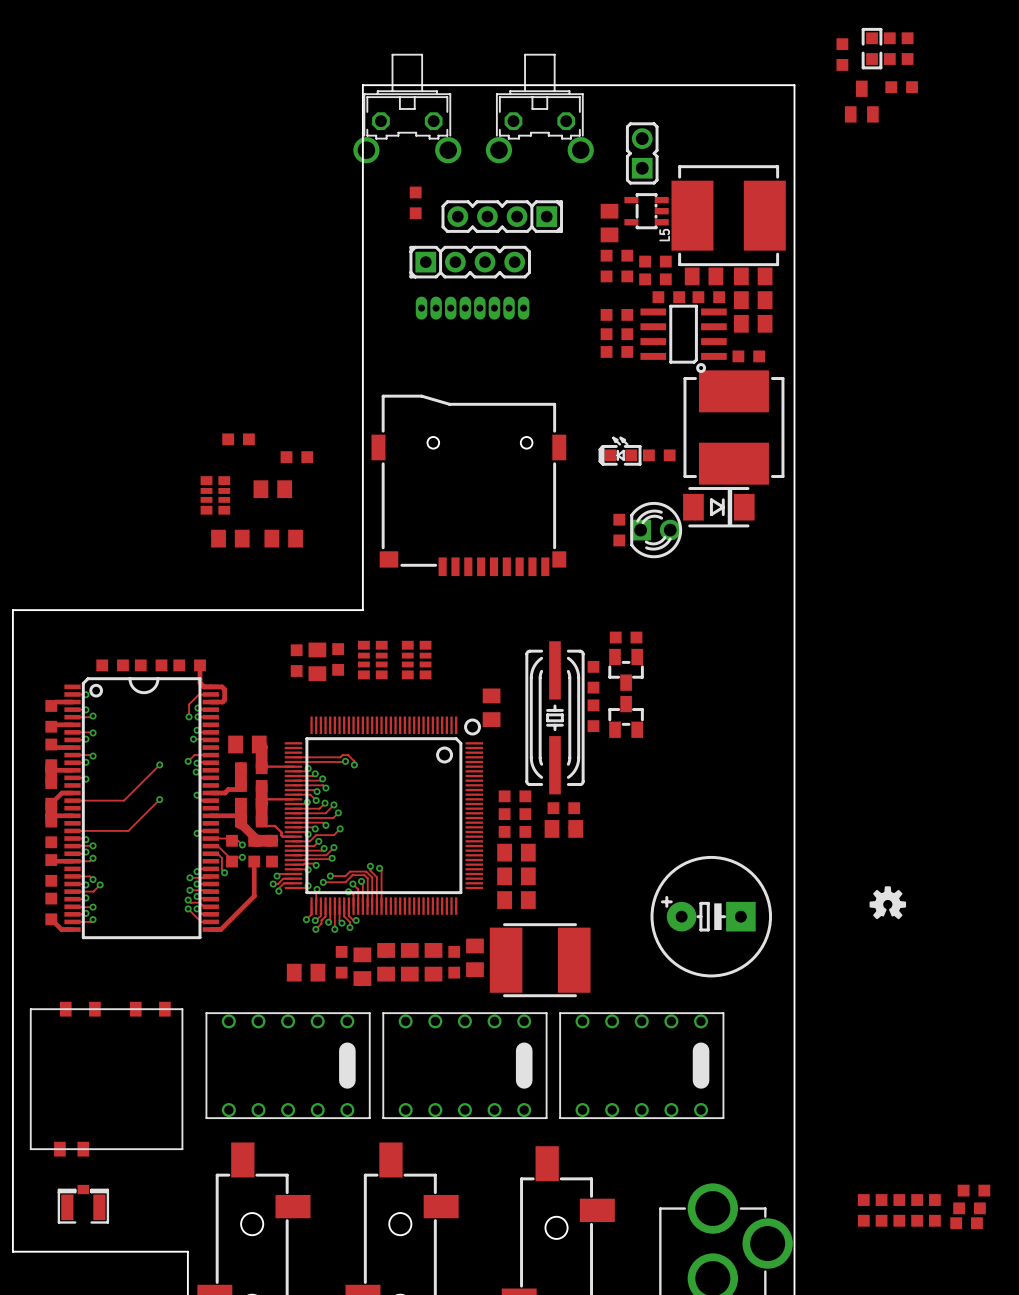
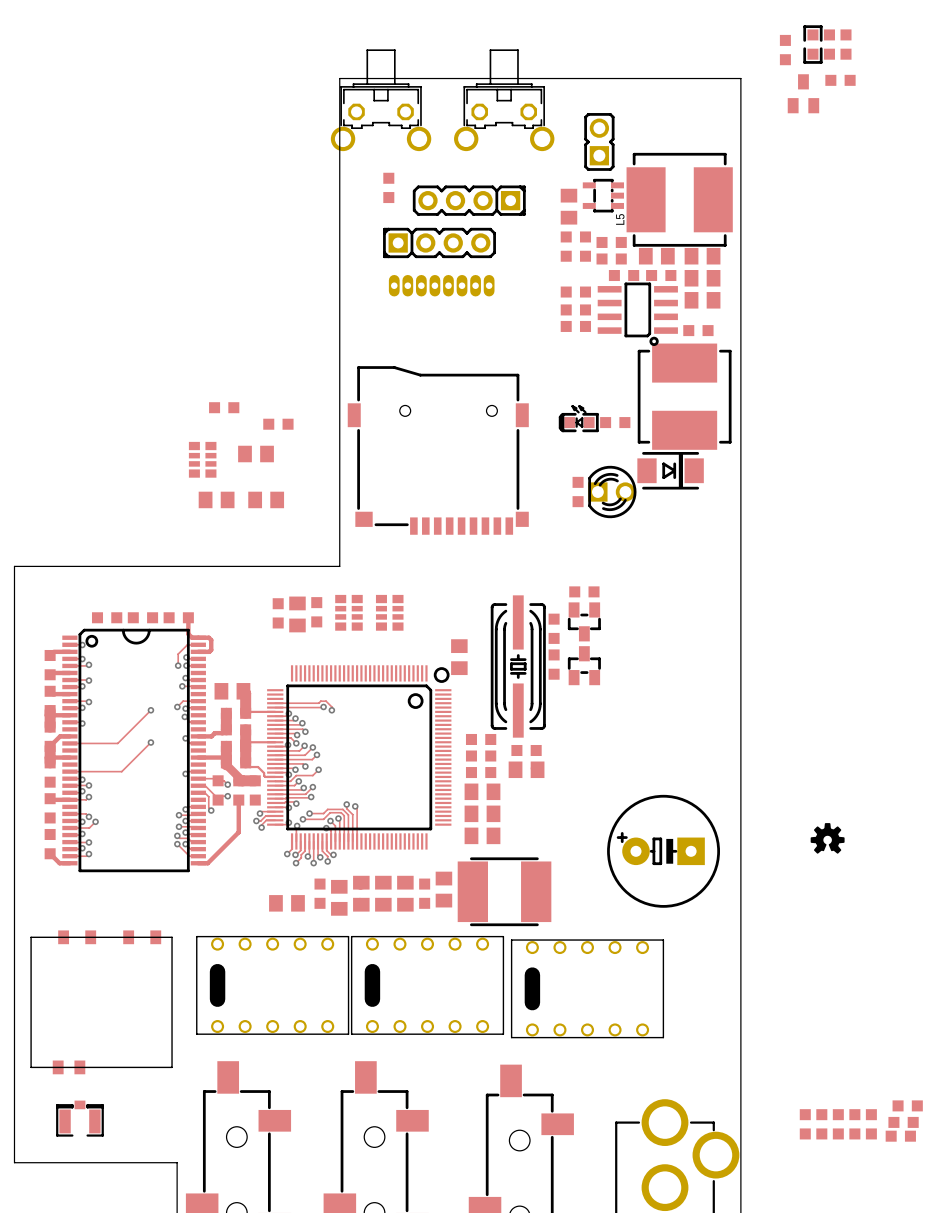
part rotation: 0° (288, 1065) -> 180° (272, 985)
part rotation: 0° (464, 1065) -> 180° (427, 985)
part rotation: 0° (641, 1065) -> 180° (587, 988)

